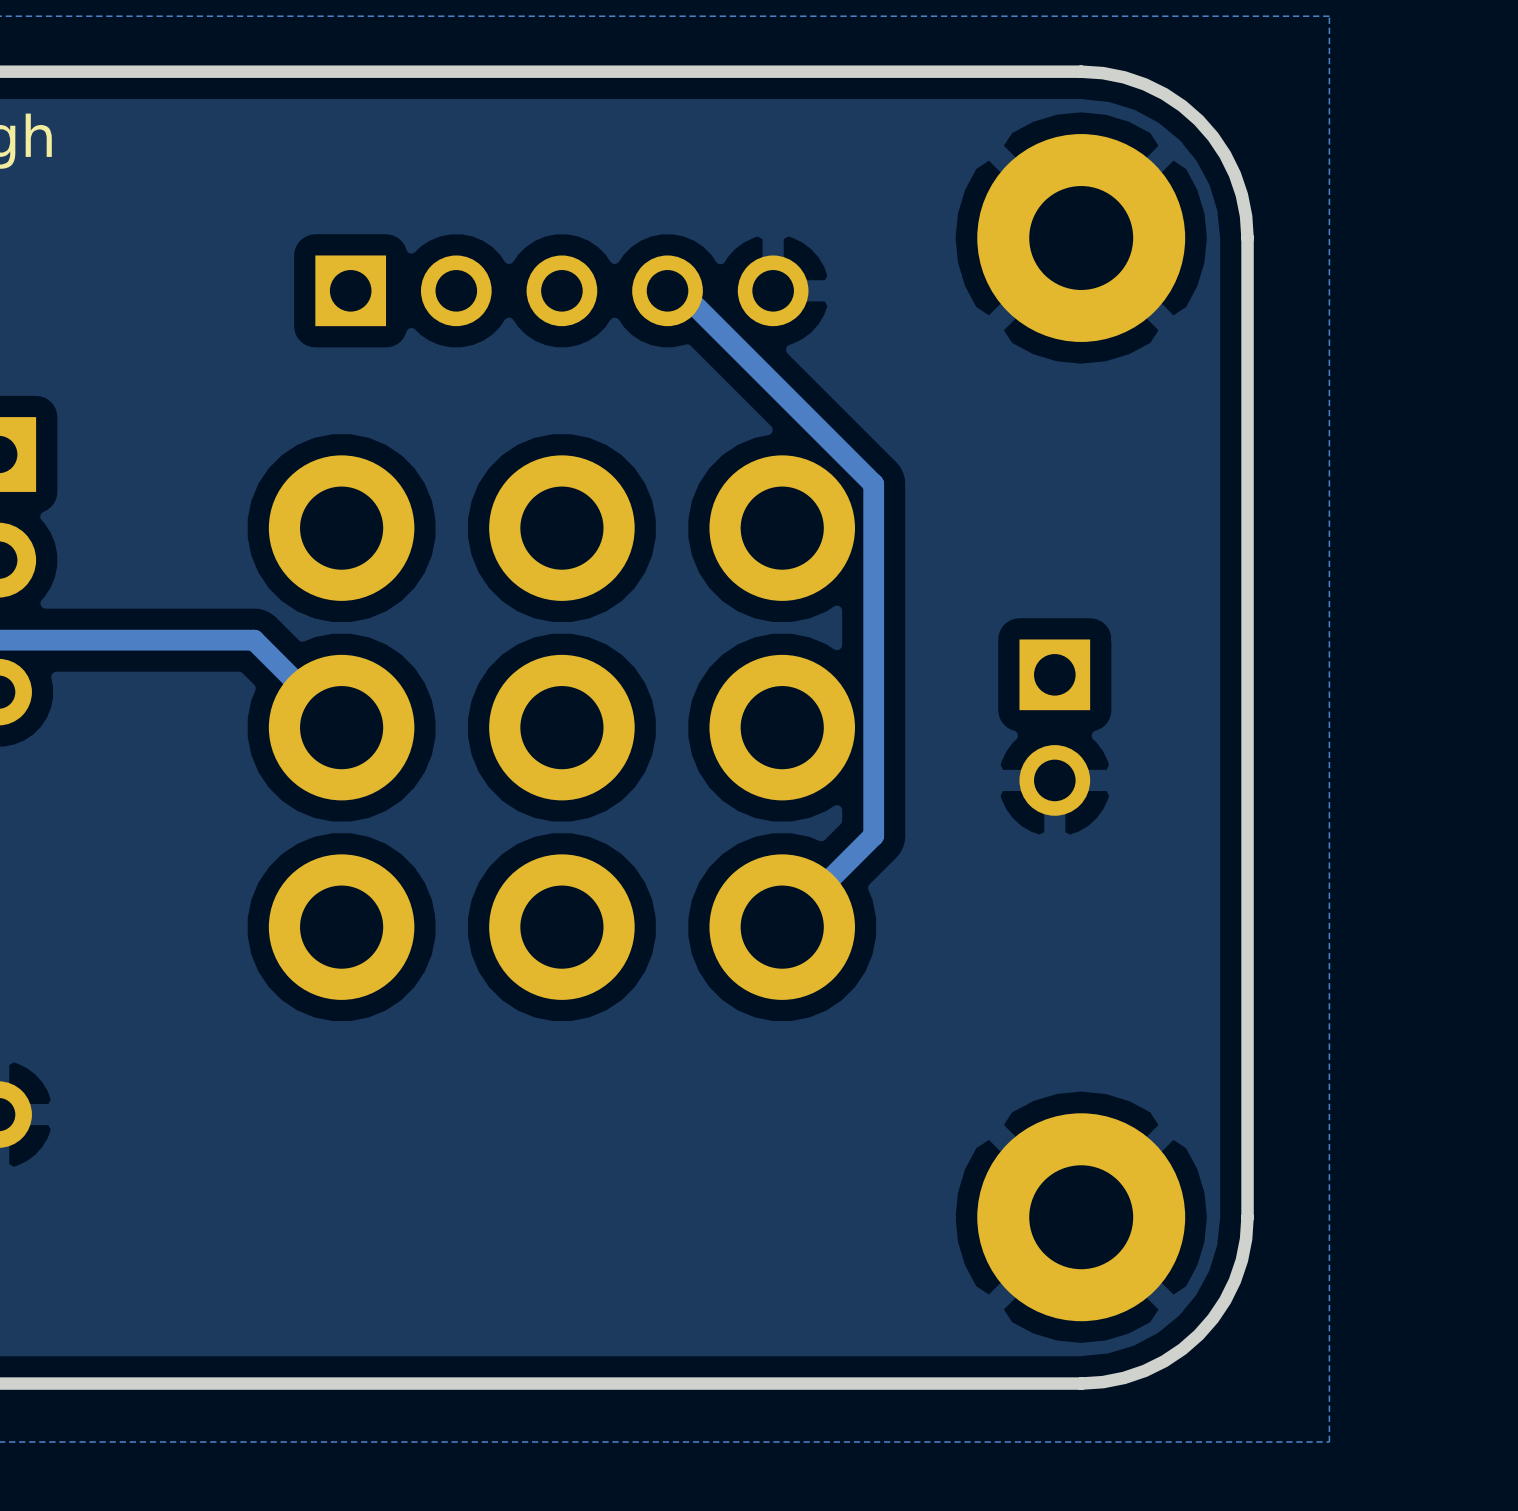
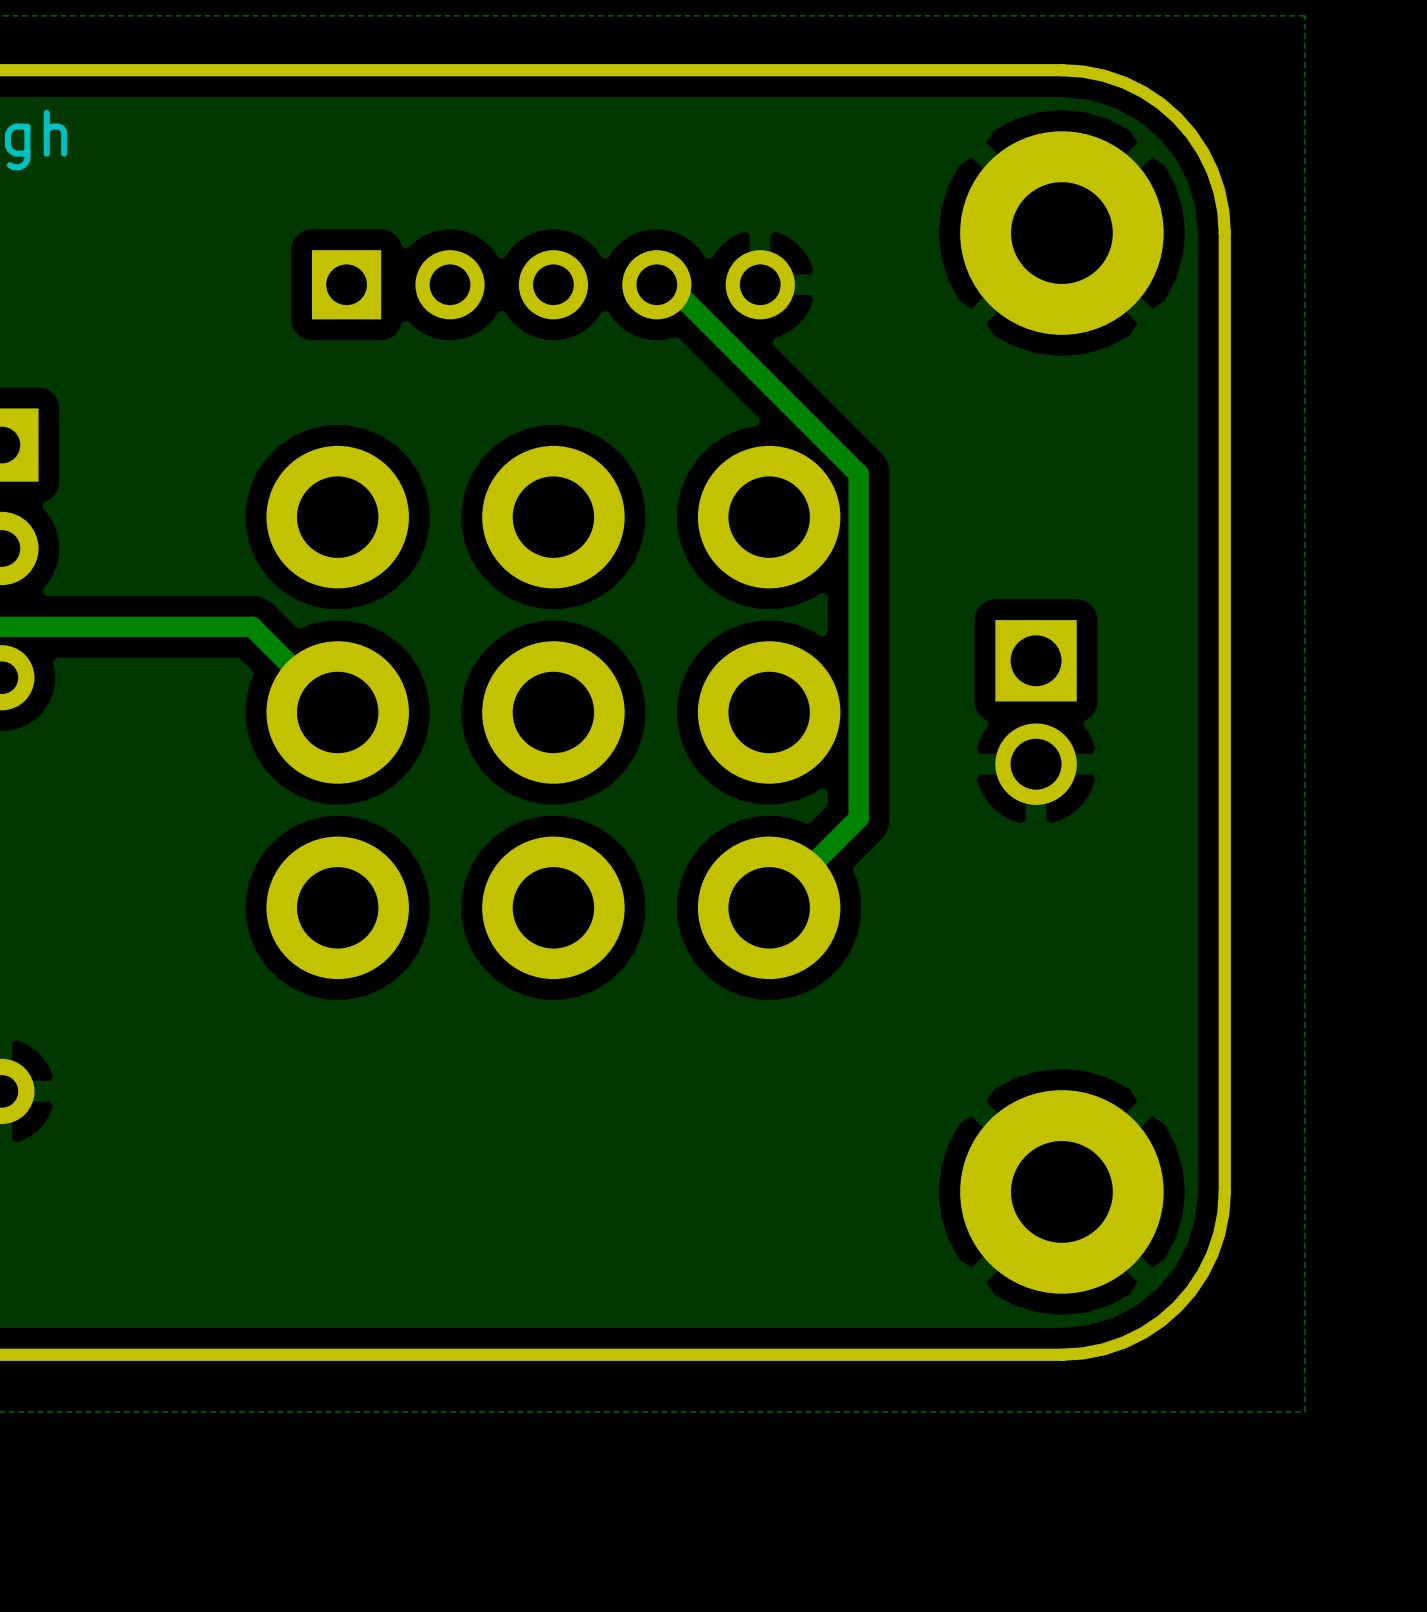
part footprint: [1019, 639, 1091, 816] -> [995, 620, 1077, 805]

